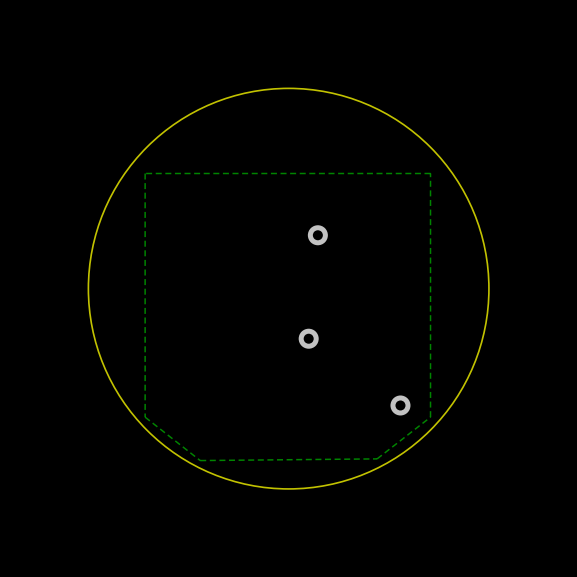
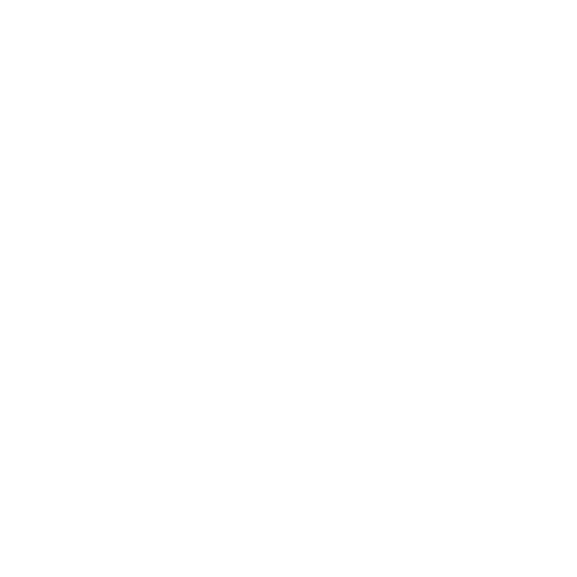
round board edge: [87, 87, 490, 490] -> none
zone outline: (430, 173) (430, 417) (377, 458) (200, 460) (145, 417) (145, 173) (430, 173) -> none
via: (317, 235) -> none
via: (308, 338) -> none
via: (400, 405) -> none

